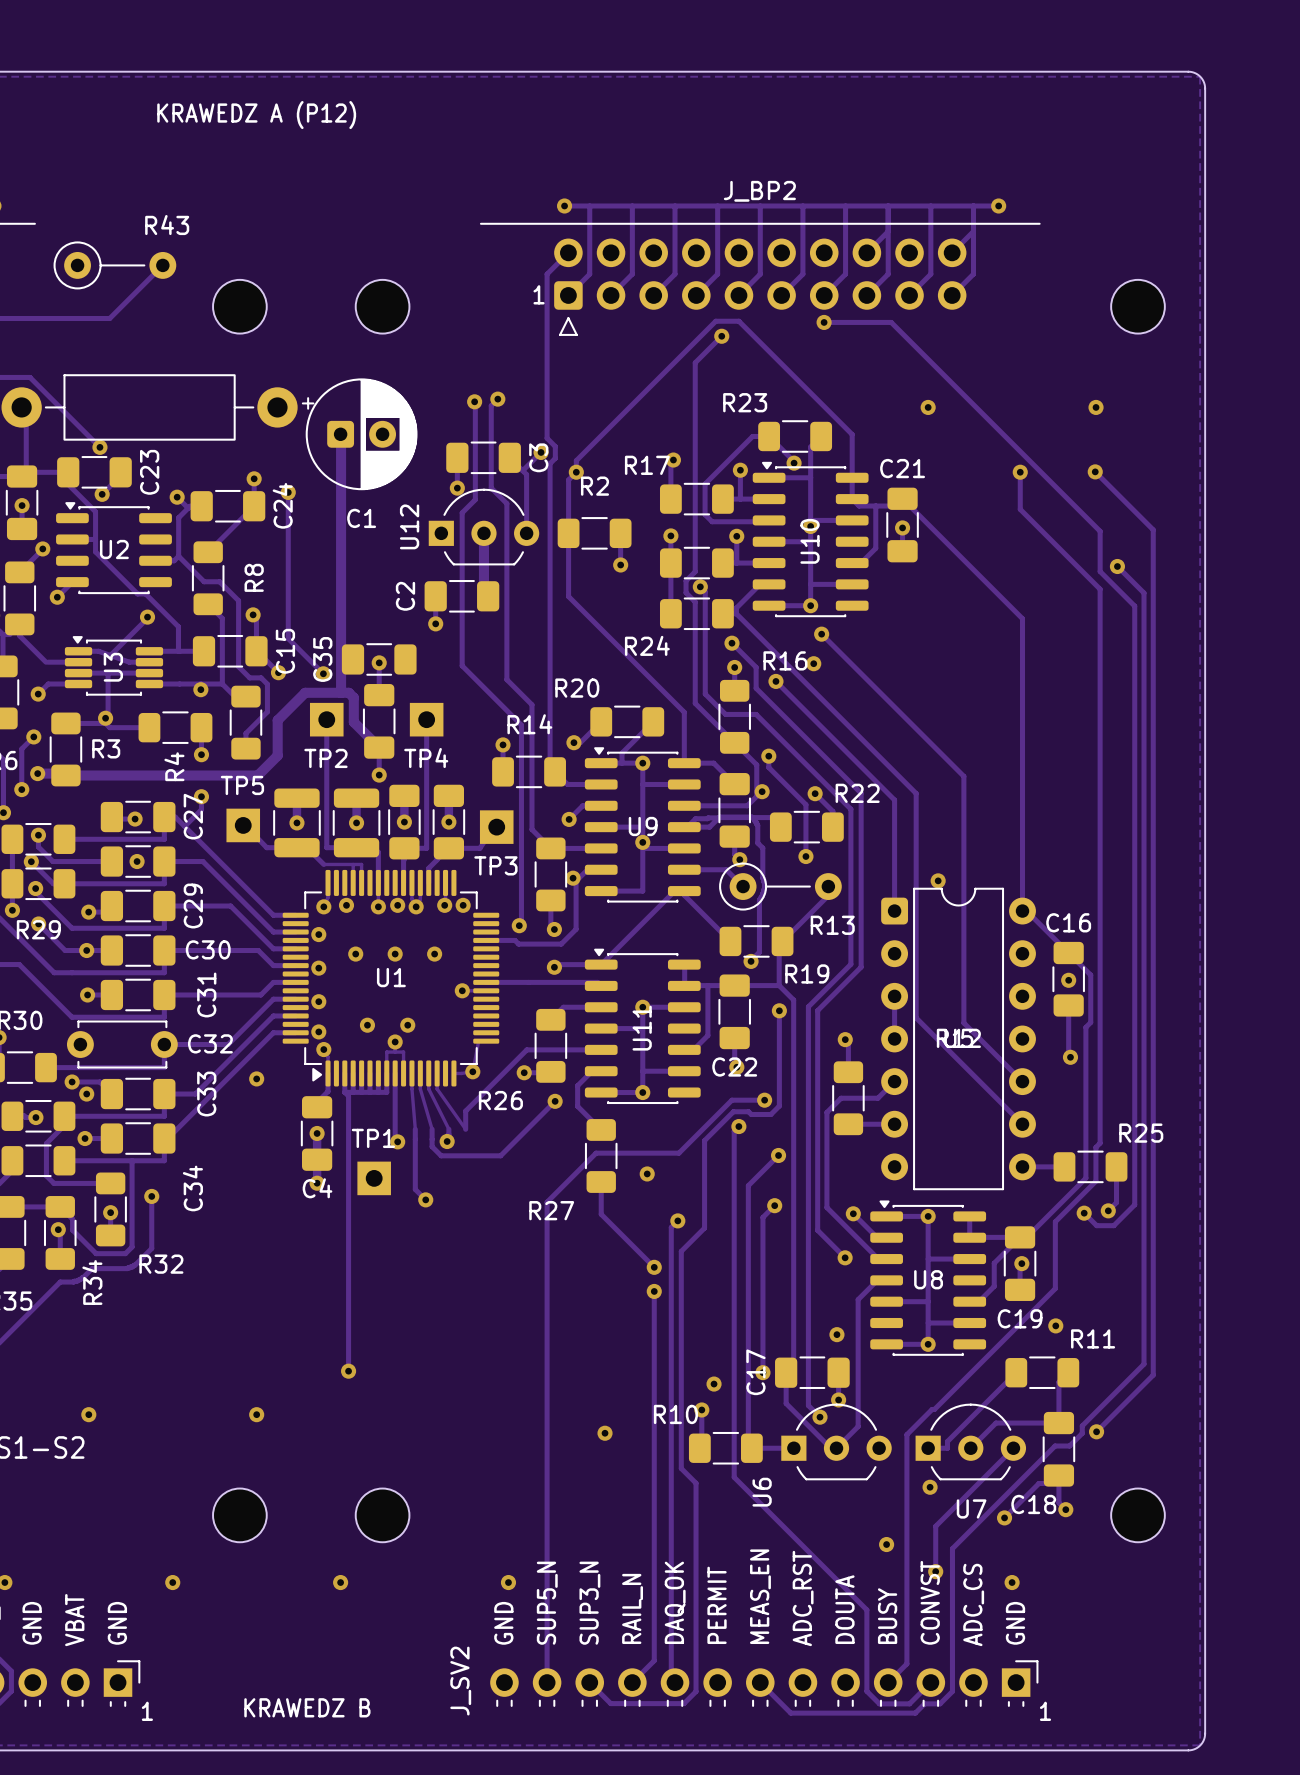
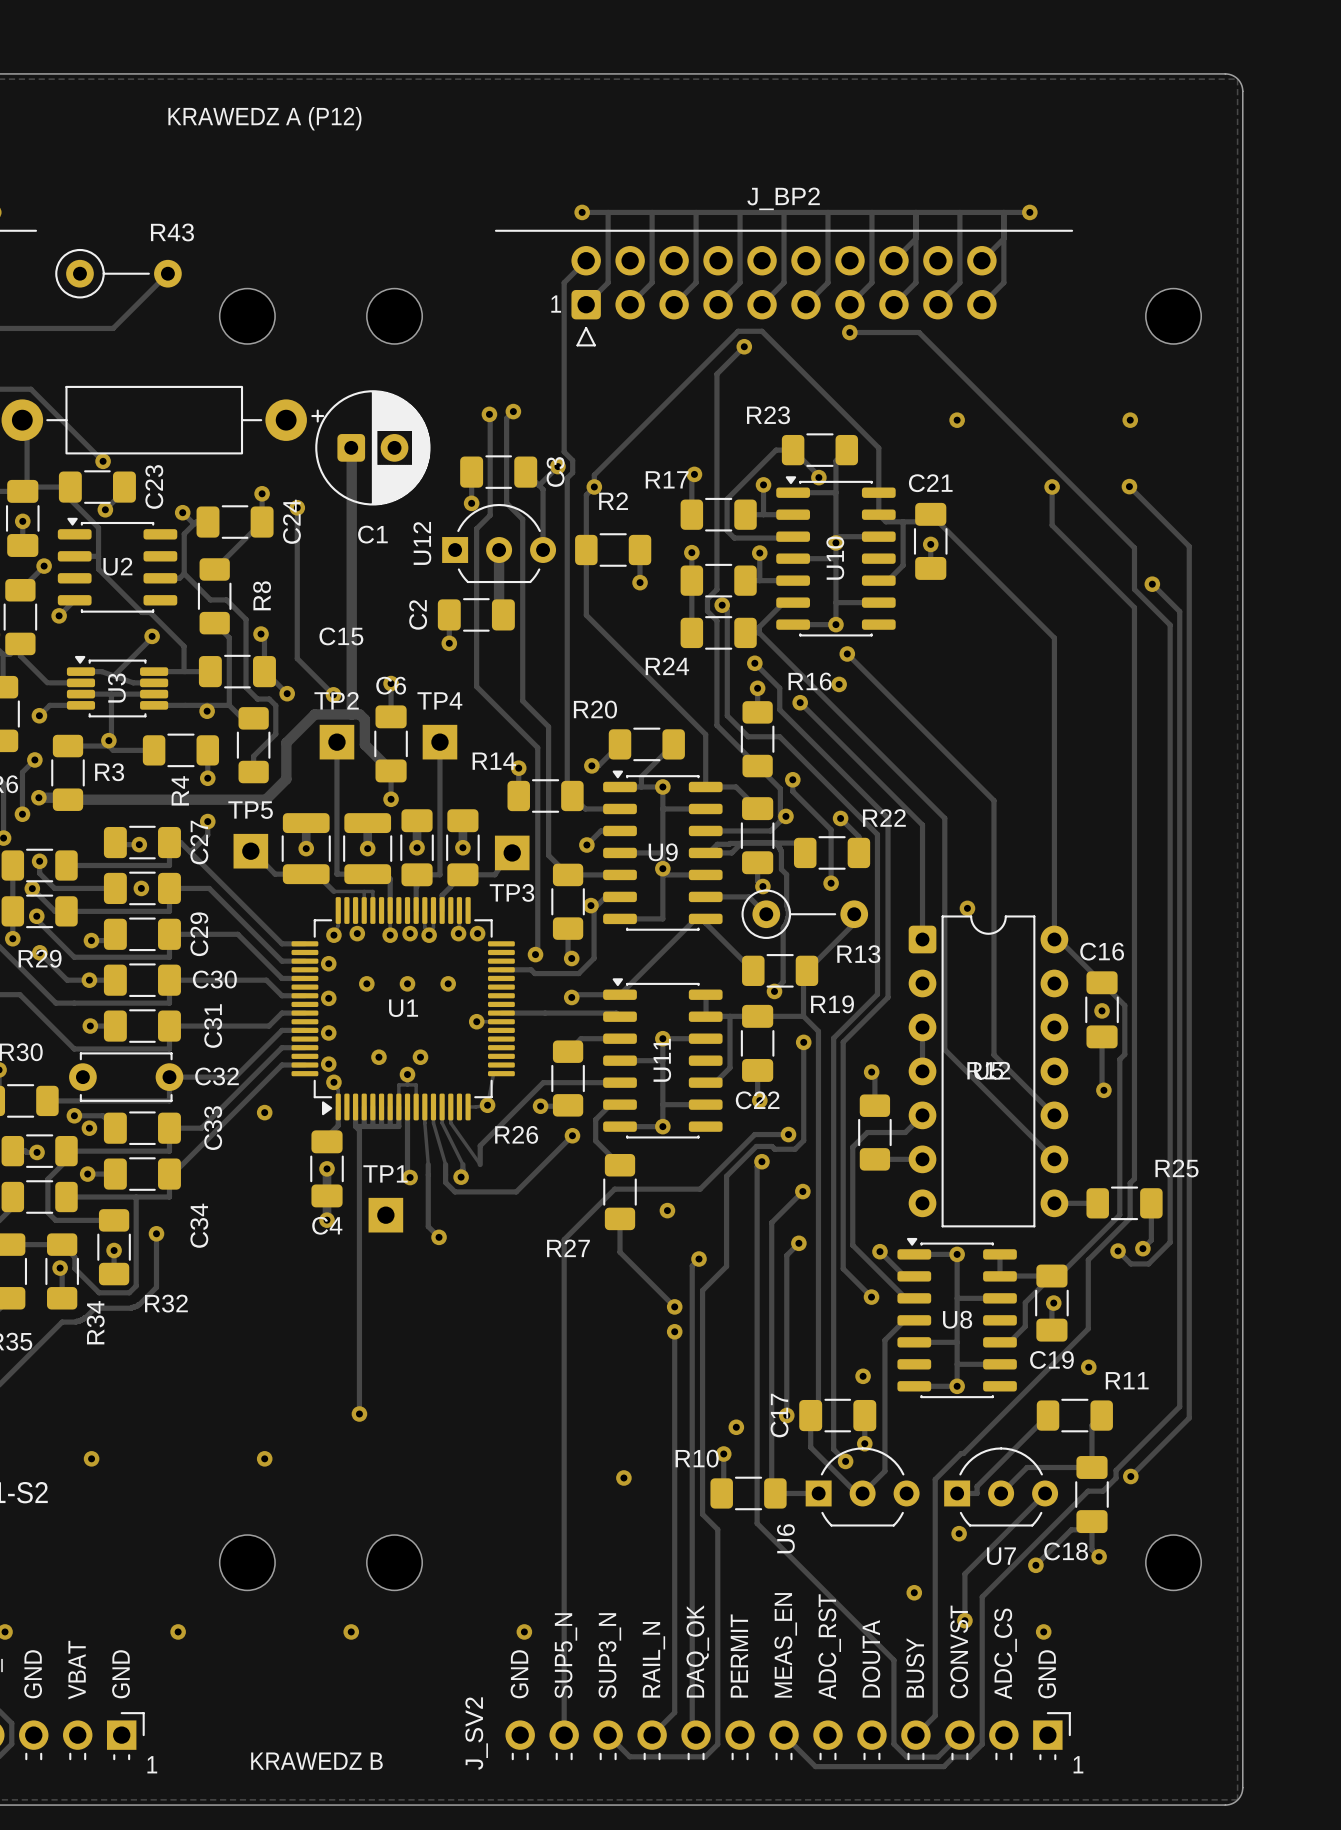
C15 name rotation: 0° (285, 651) -> 90° clockwise (341, 636)
C35: (379, 659) -> none
C6 name: none -> C6 (391, 685)
R14 name position: R14 (529, 724) -> R14 (494, 761)
TP2 name position: TP2 (325, 758) -> TP2 (336, 700)
TP4 name position: TP4 (426, 758) -> TP4 (439, 700)

